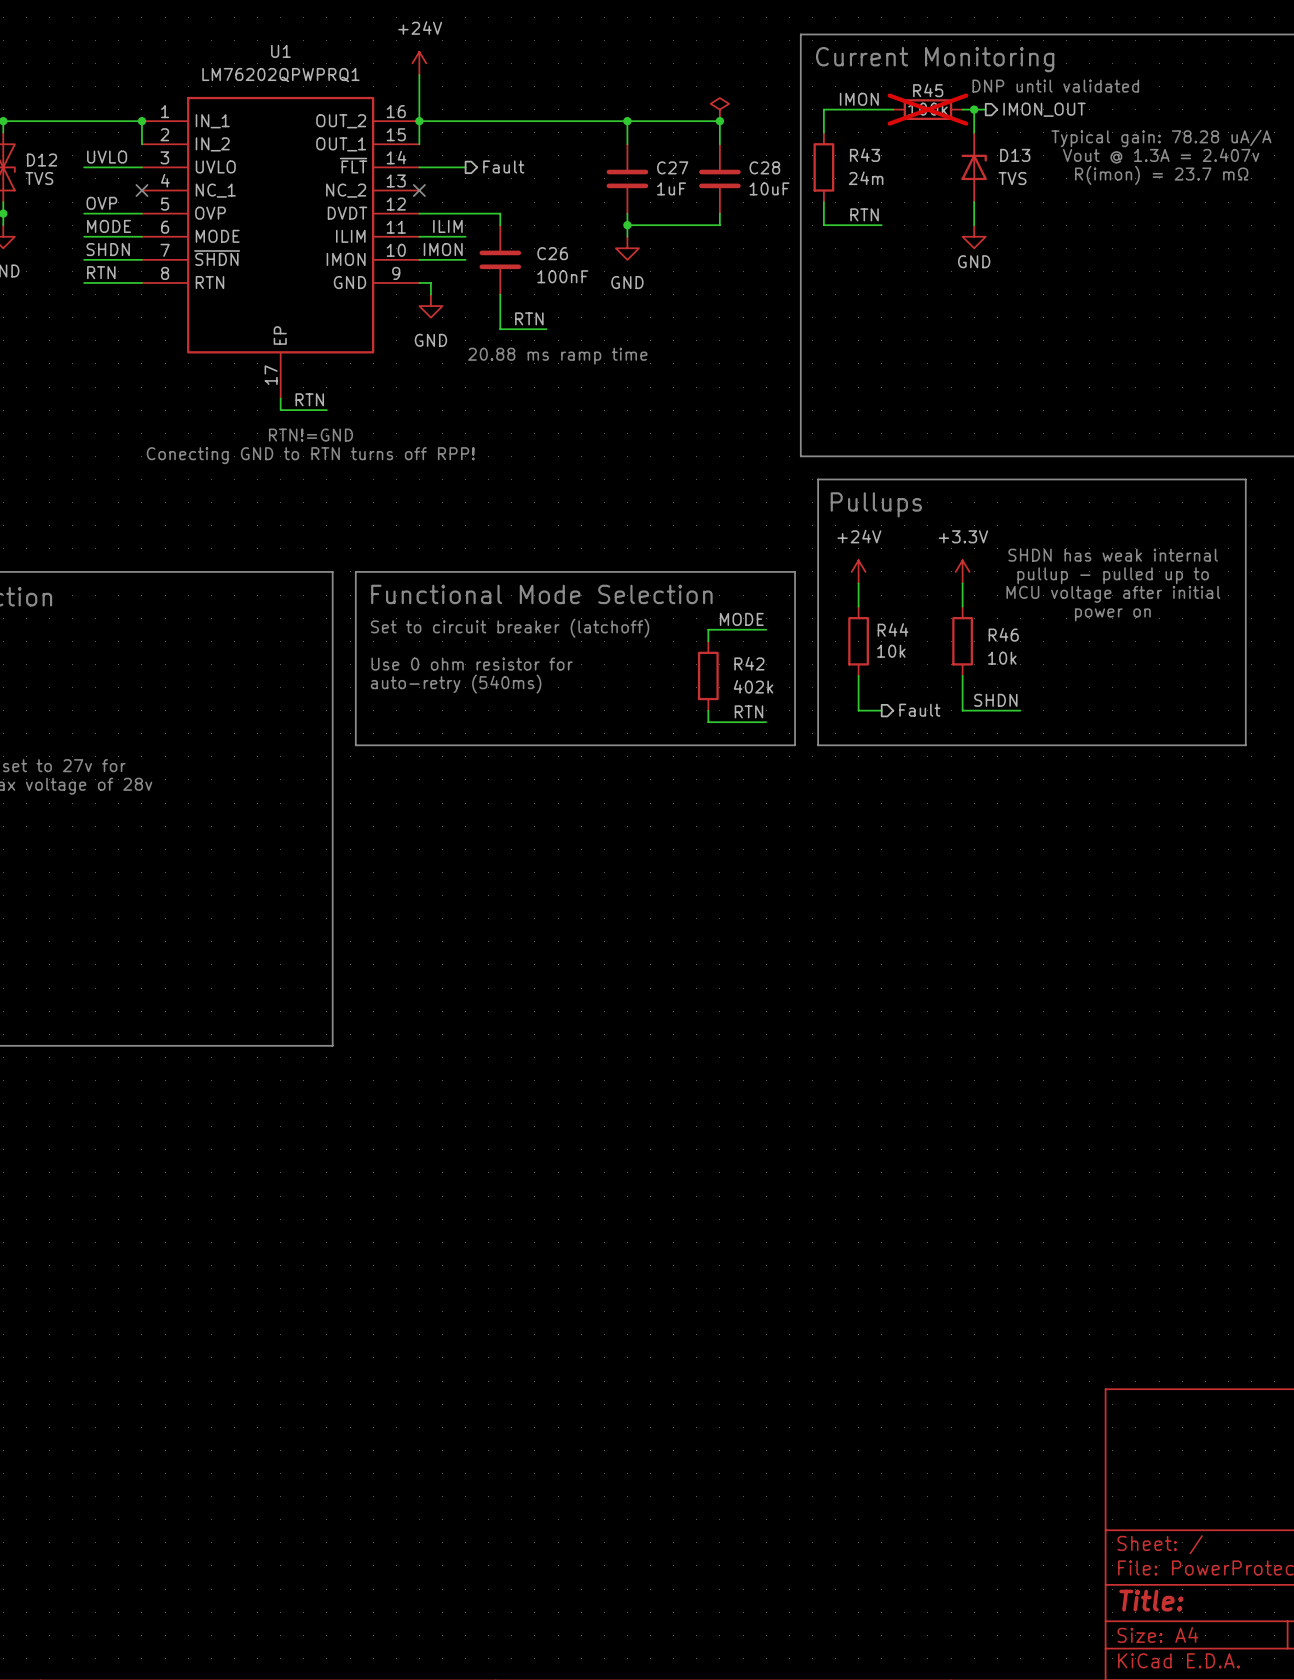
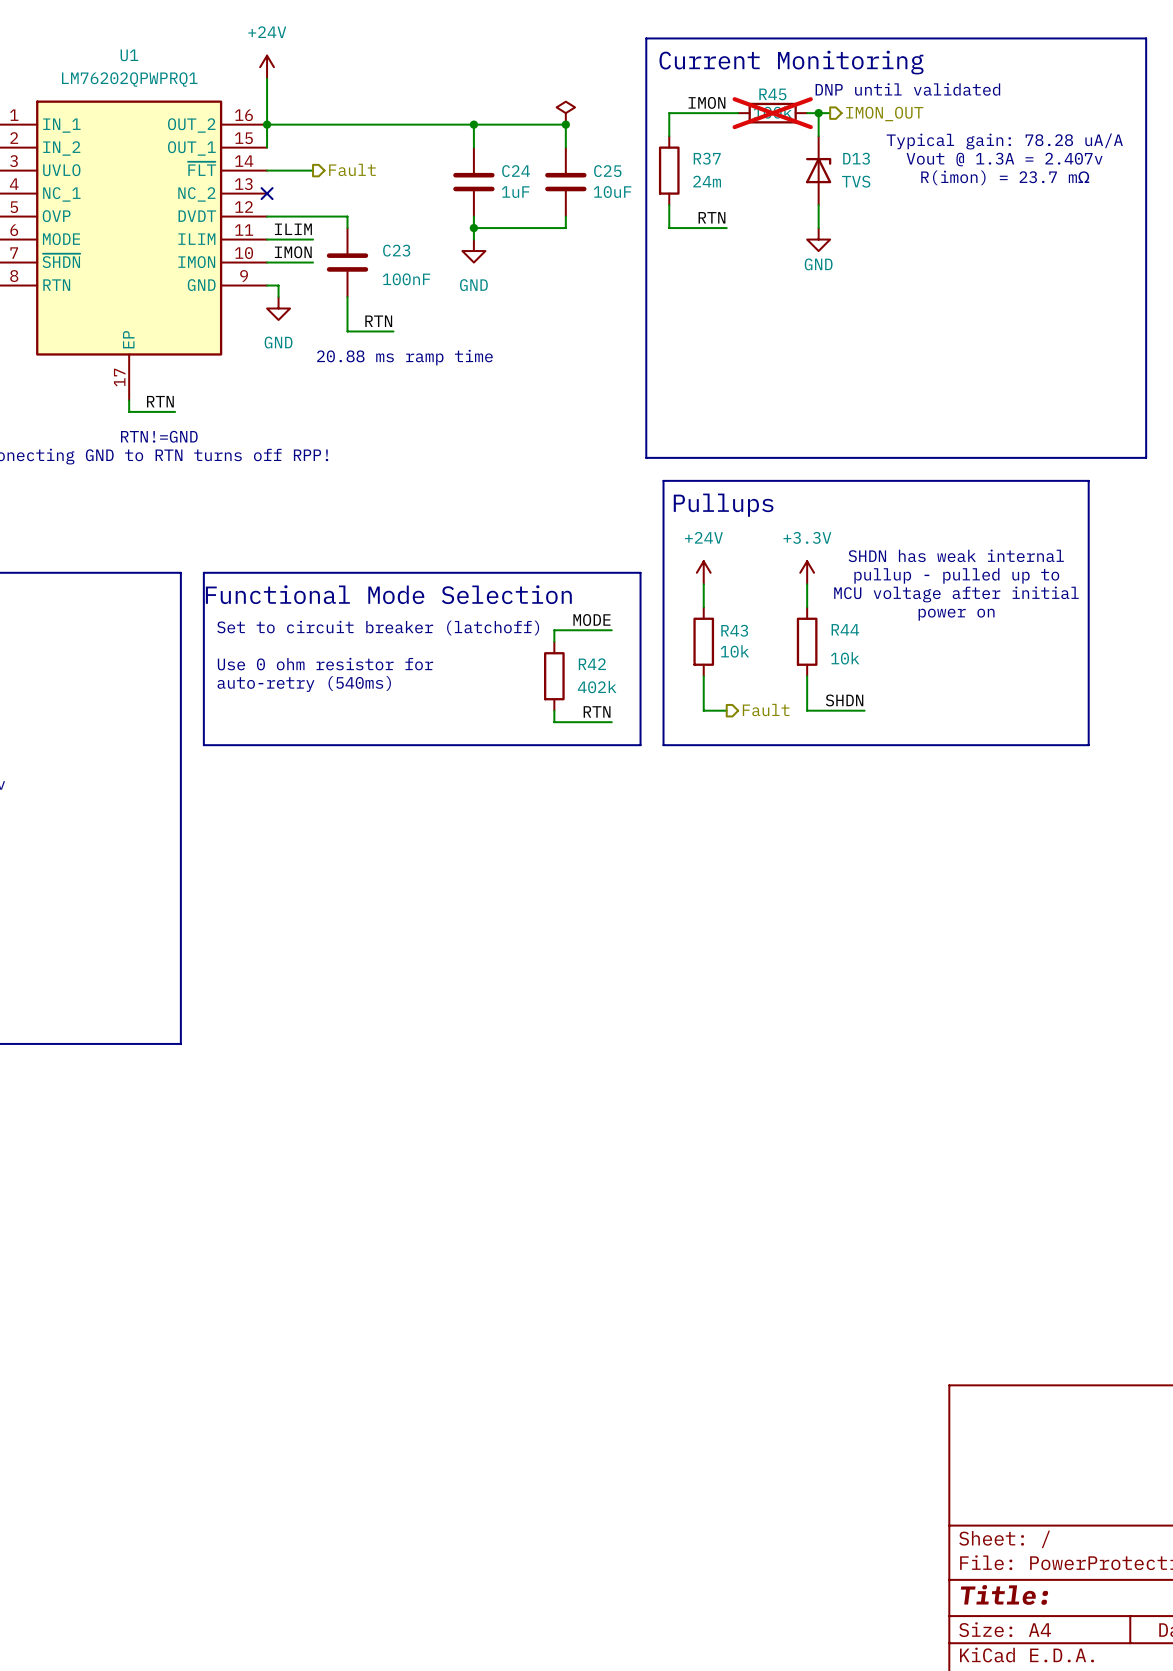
R43 name: R43 (865, 155) -> R37 (707, 158)
C27 name: C27 (672, 167) -> C24 (516, 171)
C28 name: C28 (764, 167) -> C25 (607, 171)
C26 name: C26 (552, 253) -> C23 (396, 250)
R44 name: R44 (893, 629) -> R43 (734, 630)
R46 name: R46 (1003, 634) -> R44 (845, 629)

